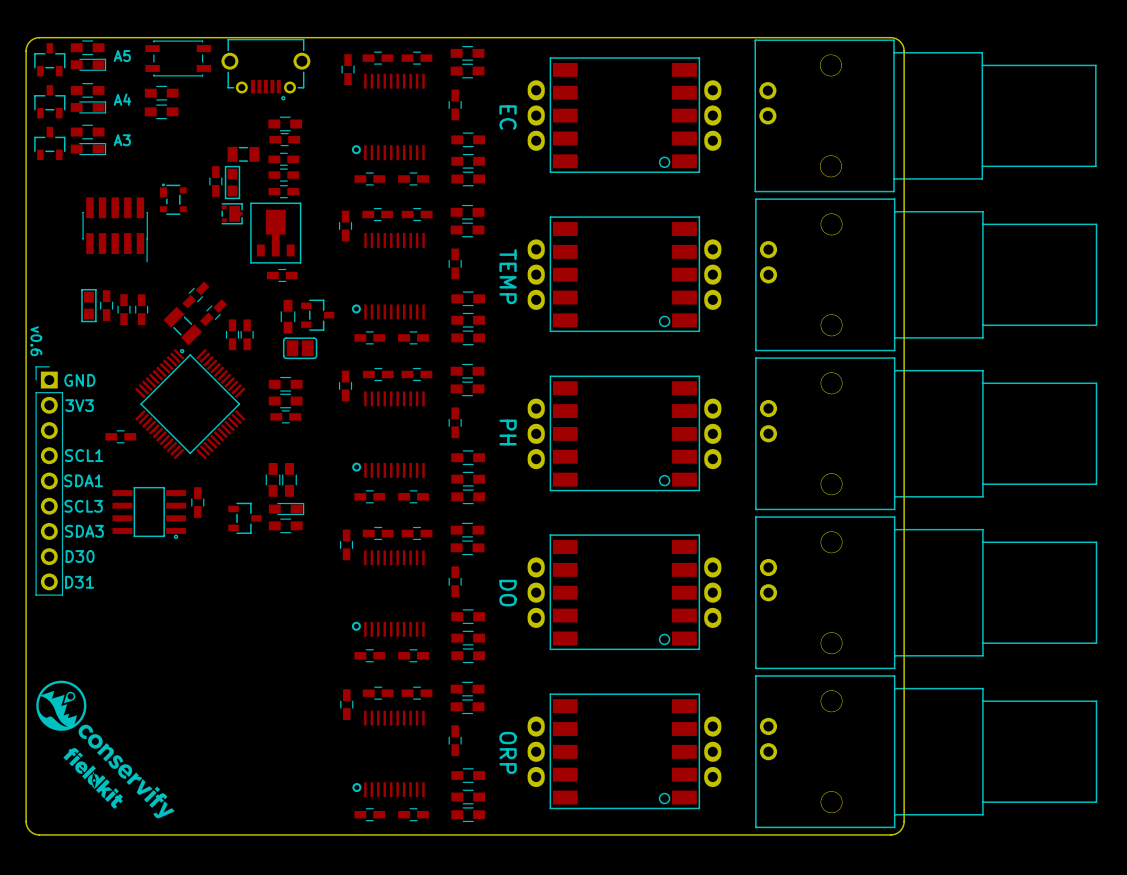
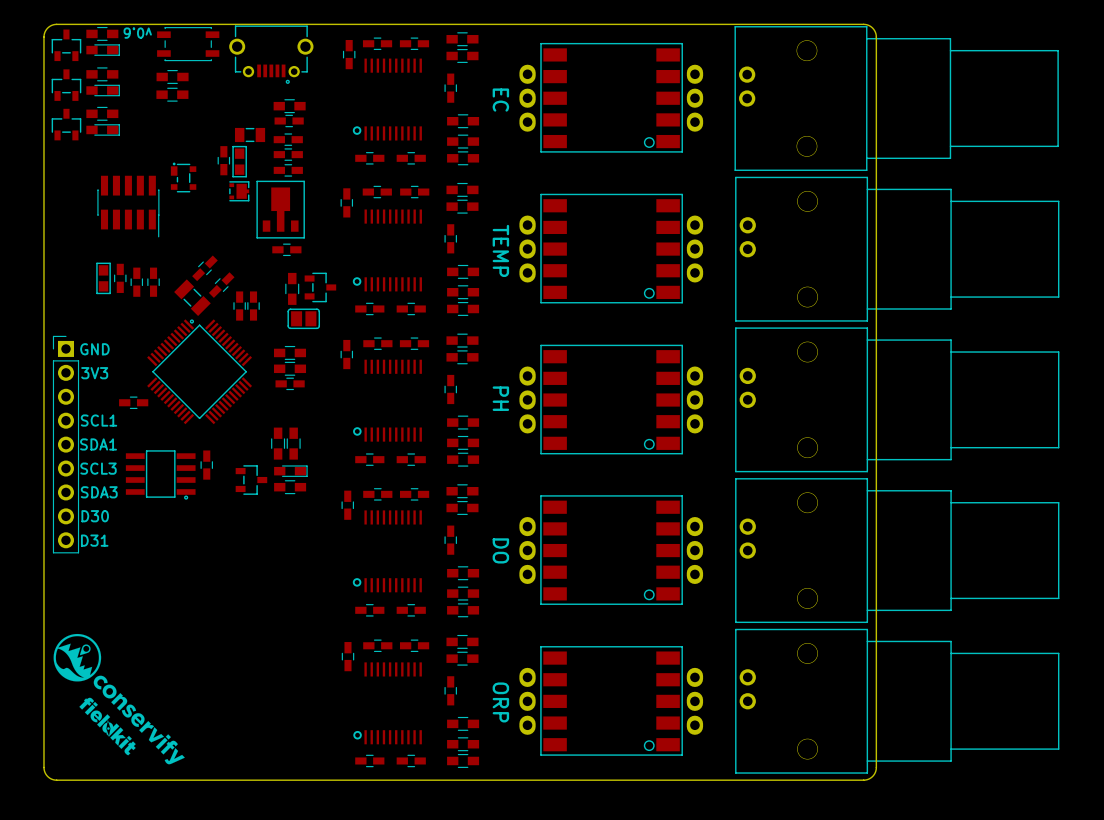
text: none -> v0.6 (137, 33)
text: A5 (122, 55) -> none
text: A4 (122, 99) -> none
text: A3 (122, 140) -> none
text: v0.6 (36, 341) -> none

